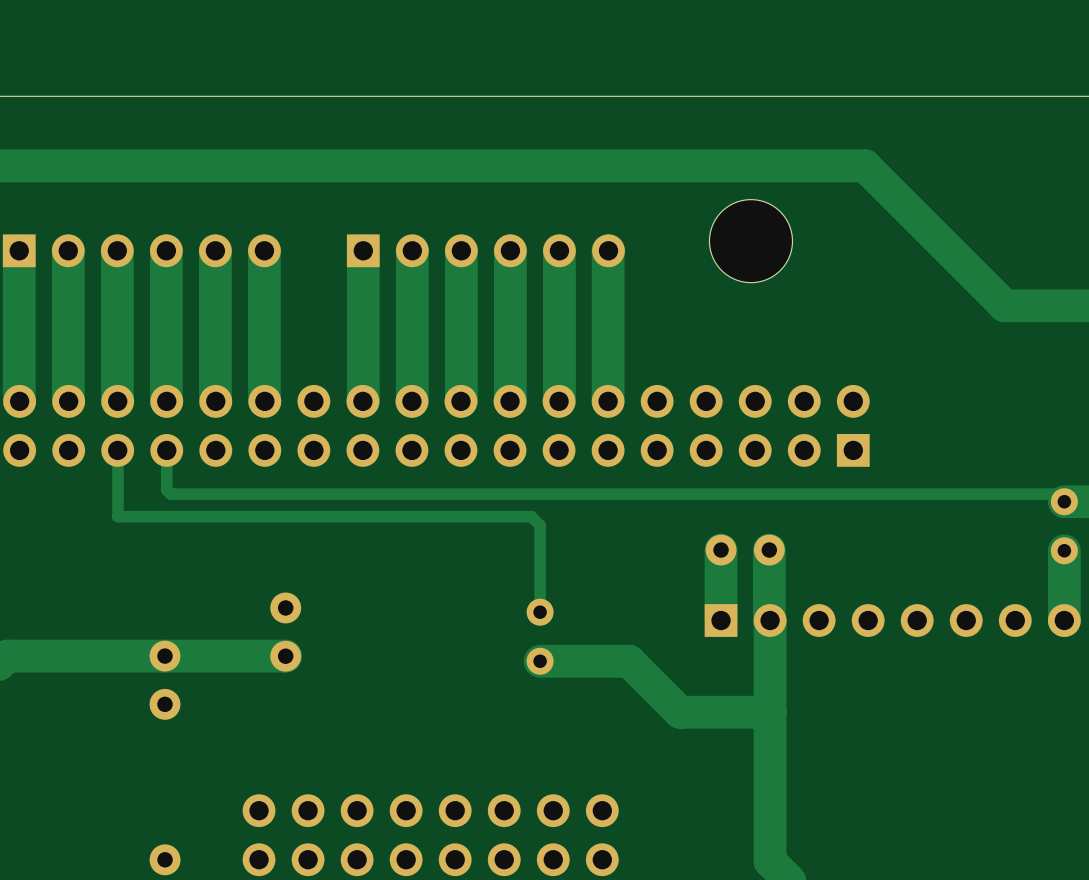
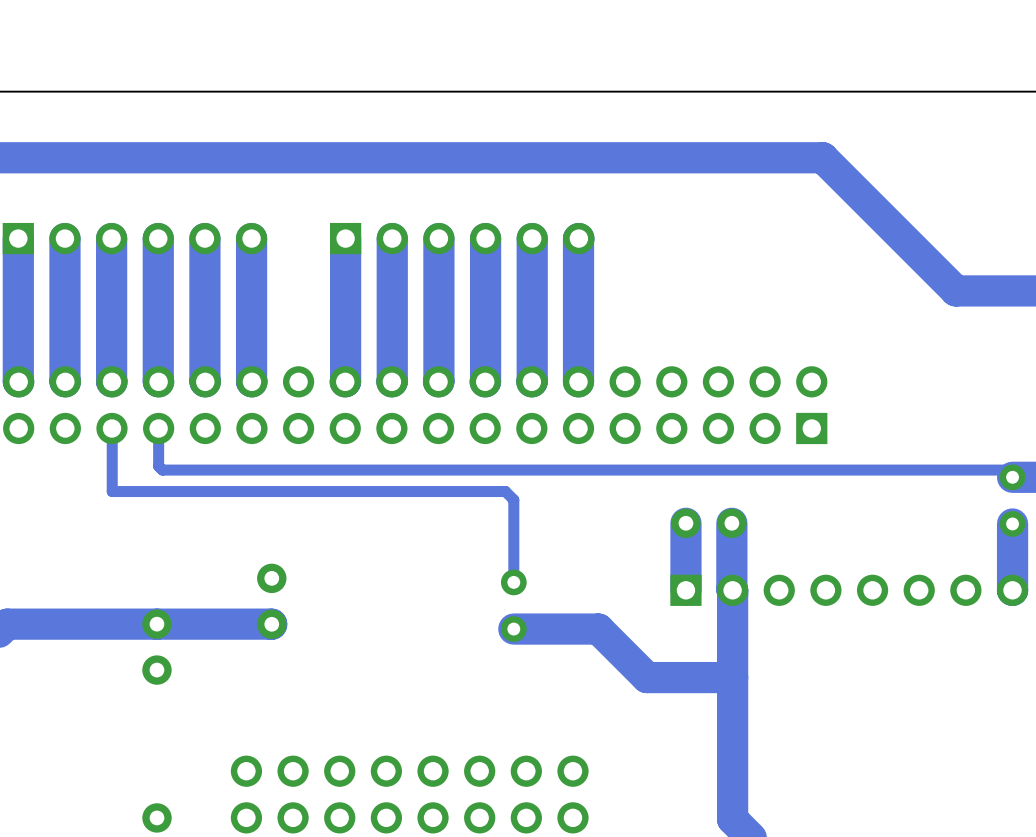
part: (750, 241) -> none

